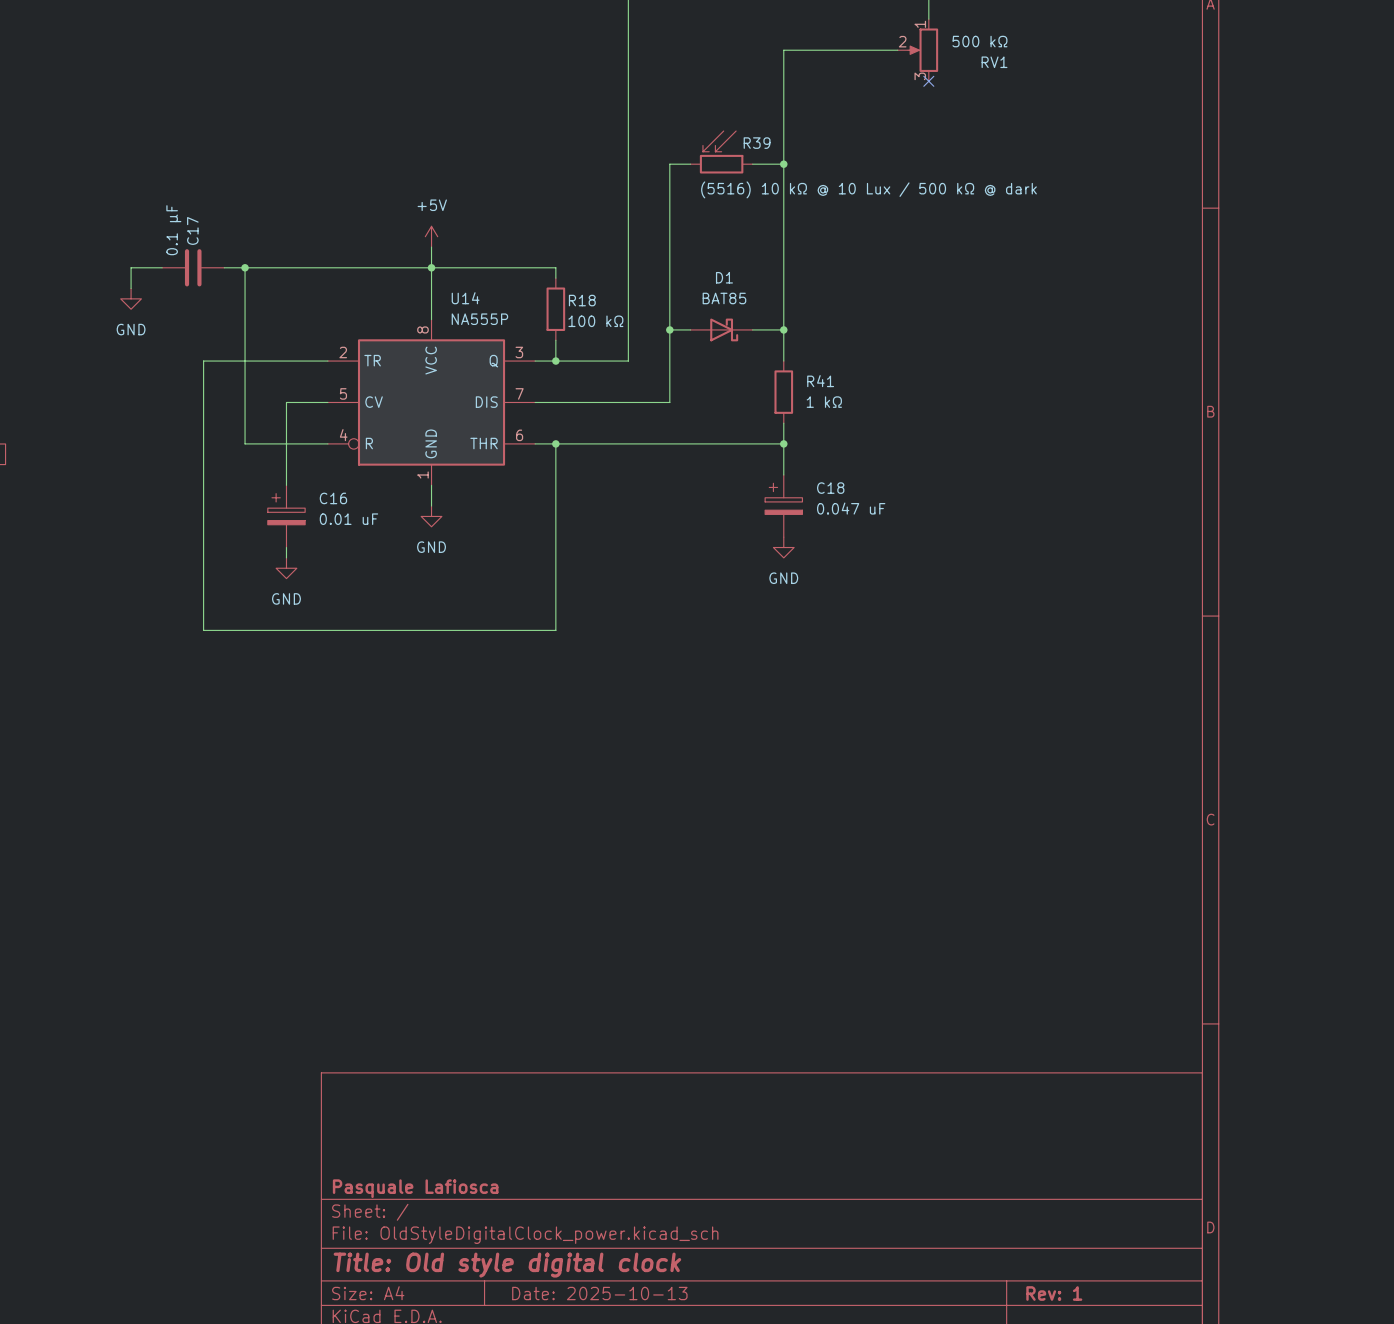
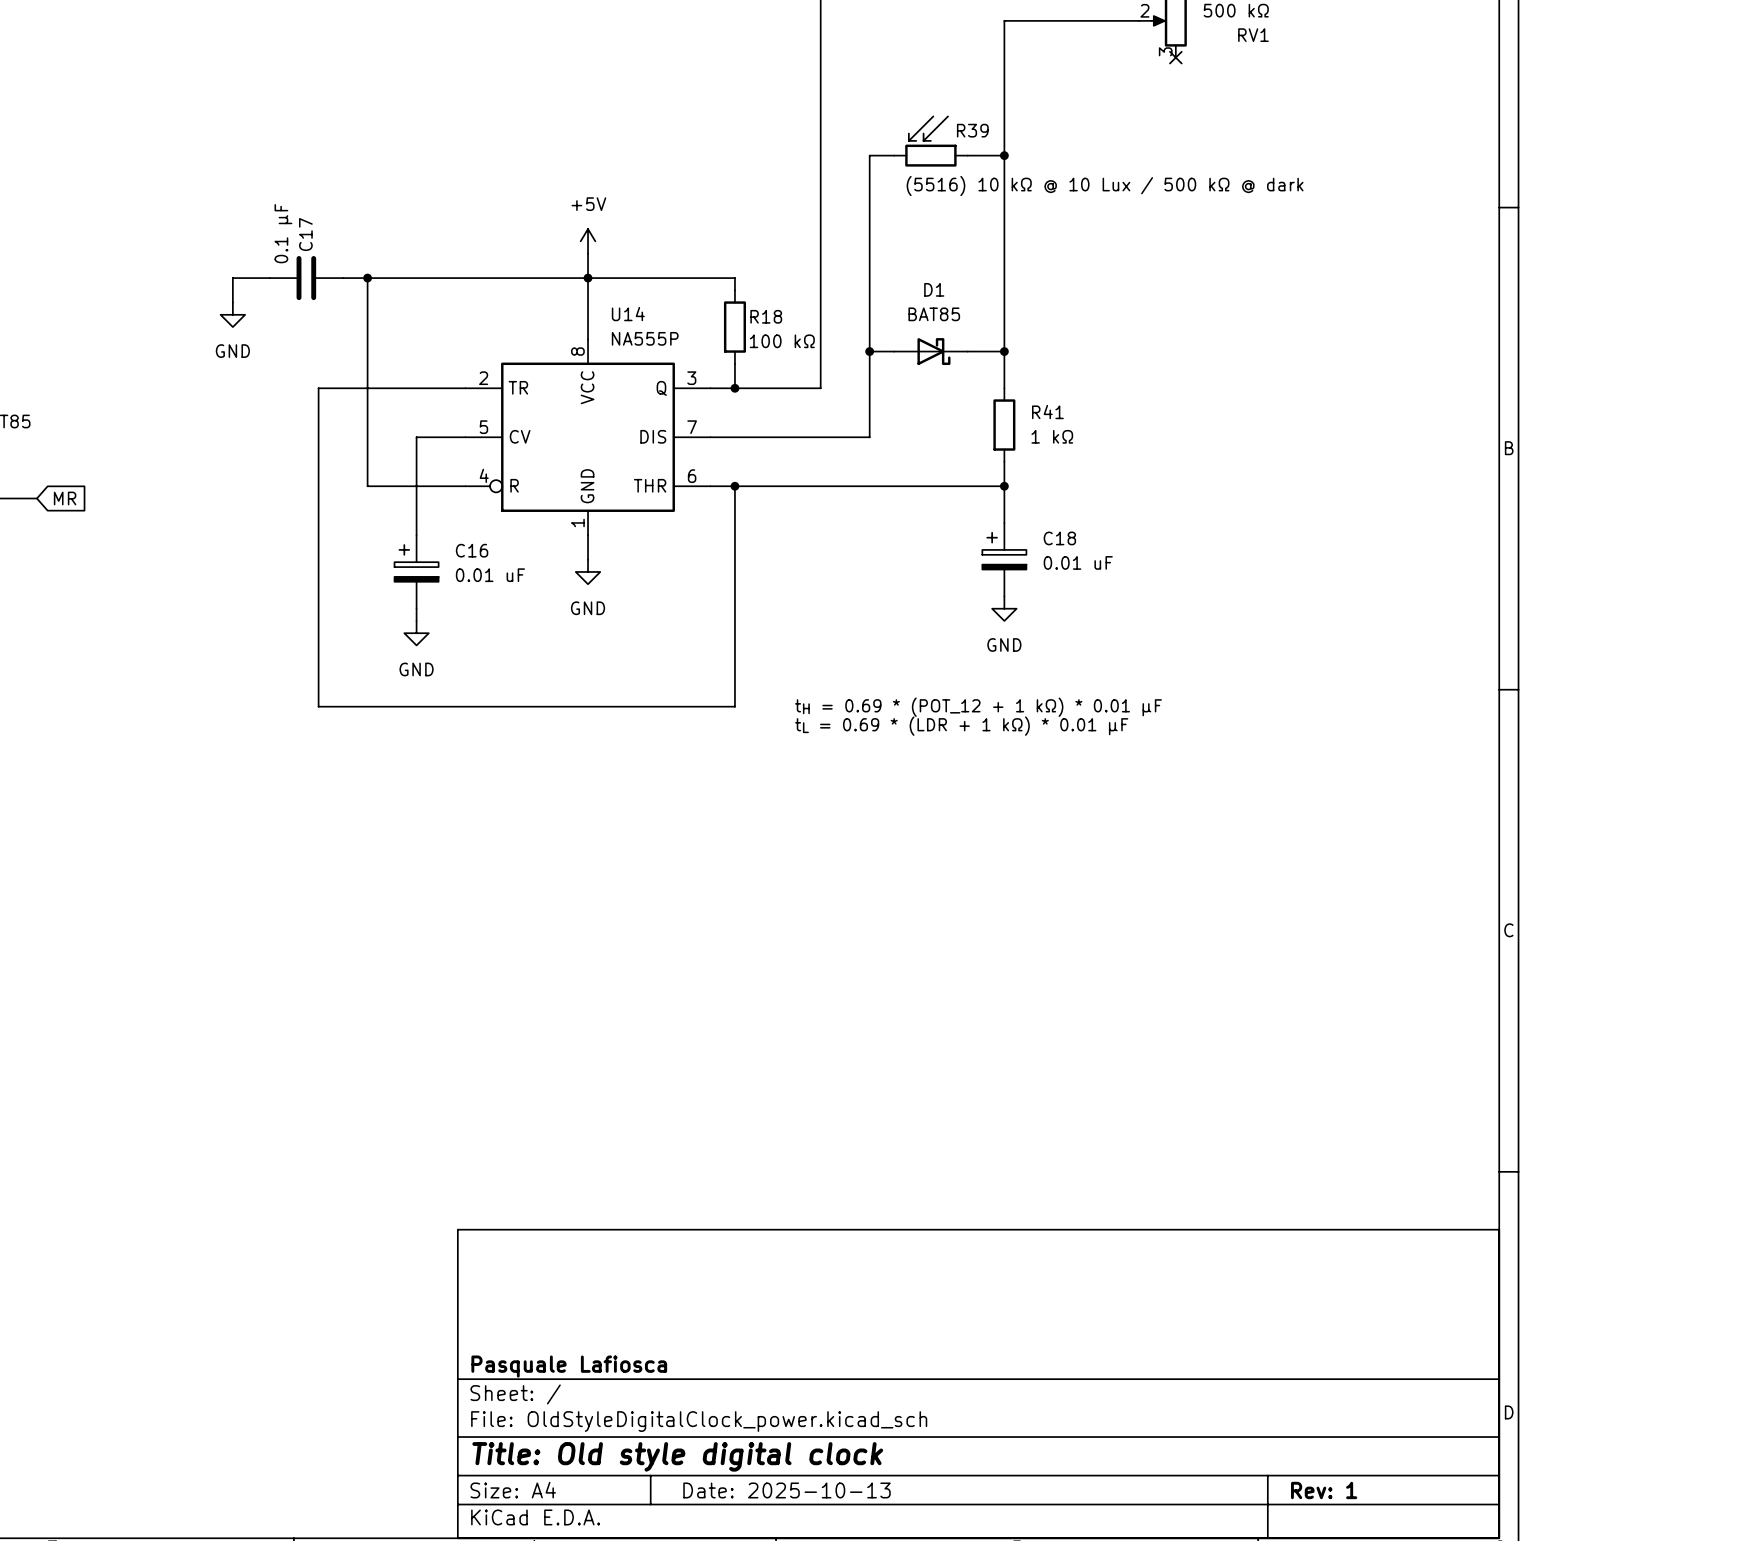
C18 value: 0.047 uF (851, 508) -> 0.01 uF (1078, 562)
text: none -> tH = 0.69 * (POT_12 + 1 kΩ) * 0.01 µF (978, 707)
text: none -> tL = 0.69 * (LDR + 1 kΩ) * 0.01 µF (961, 726)

